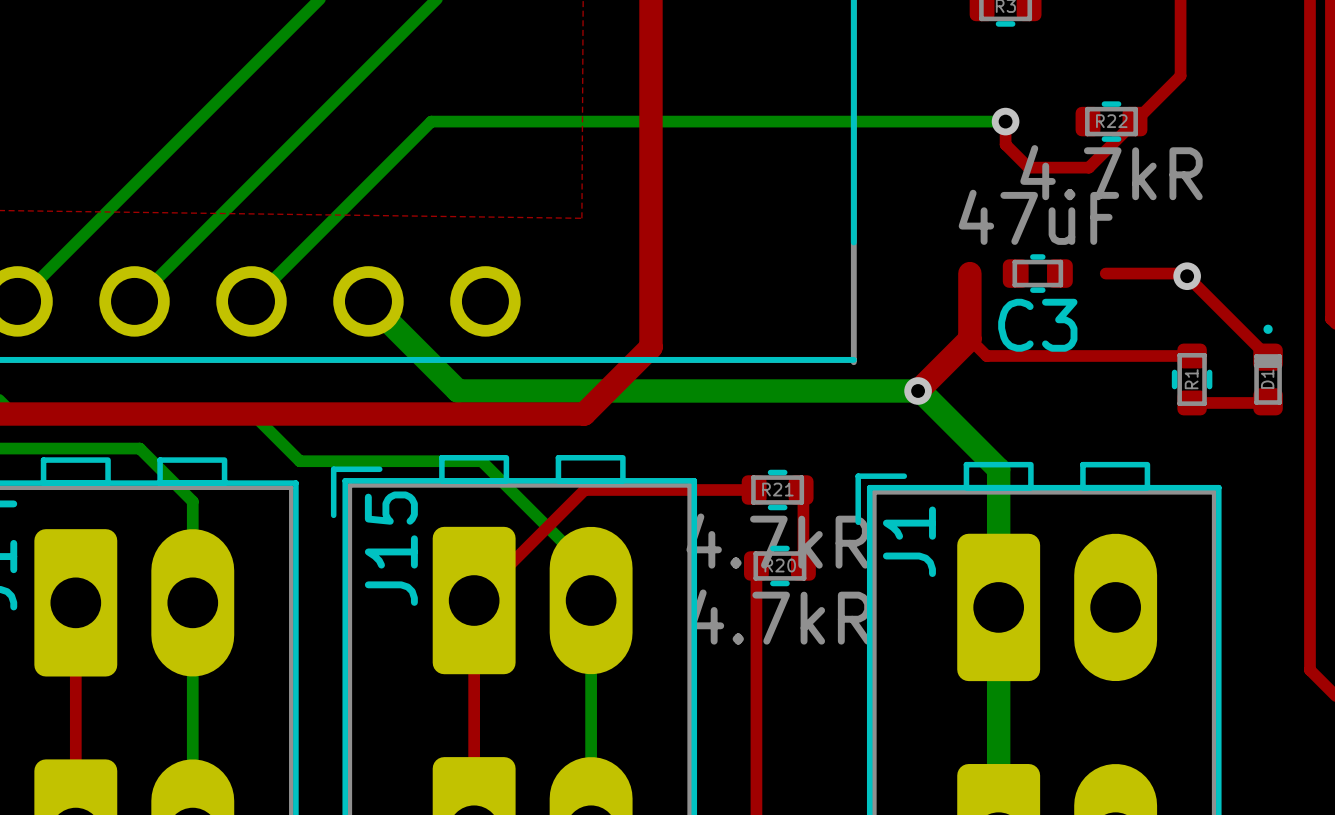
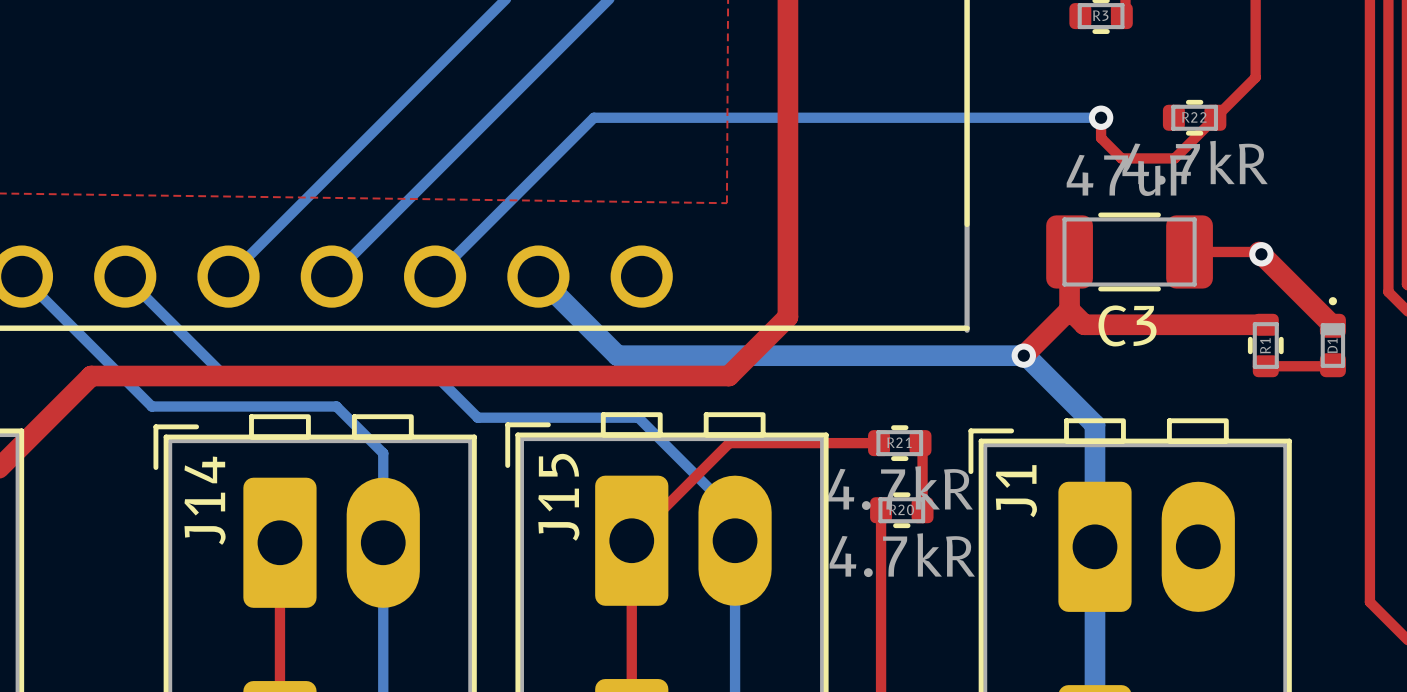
C3 footprint: [1002, 254, 1073, 293] -> [1046, 212, 1213, 292]
top track width: thin (1184, 273) (1268, 357) -> thick (1259, 251) (1332, 325)
top track width: thin (969, 339) (986, 355) (1192, 355) -> thick (1069, 309) (1084, 324) (1265, 324)

